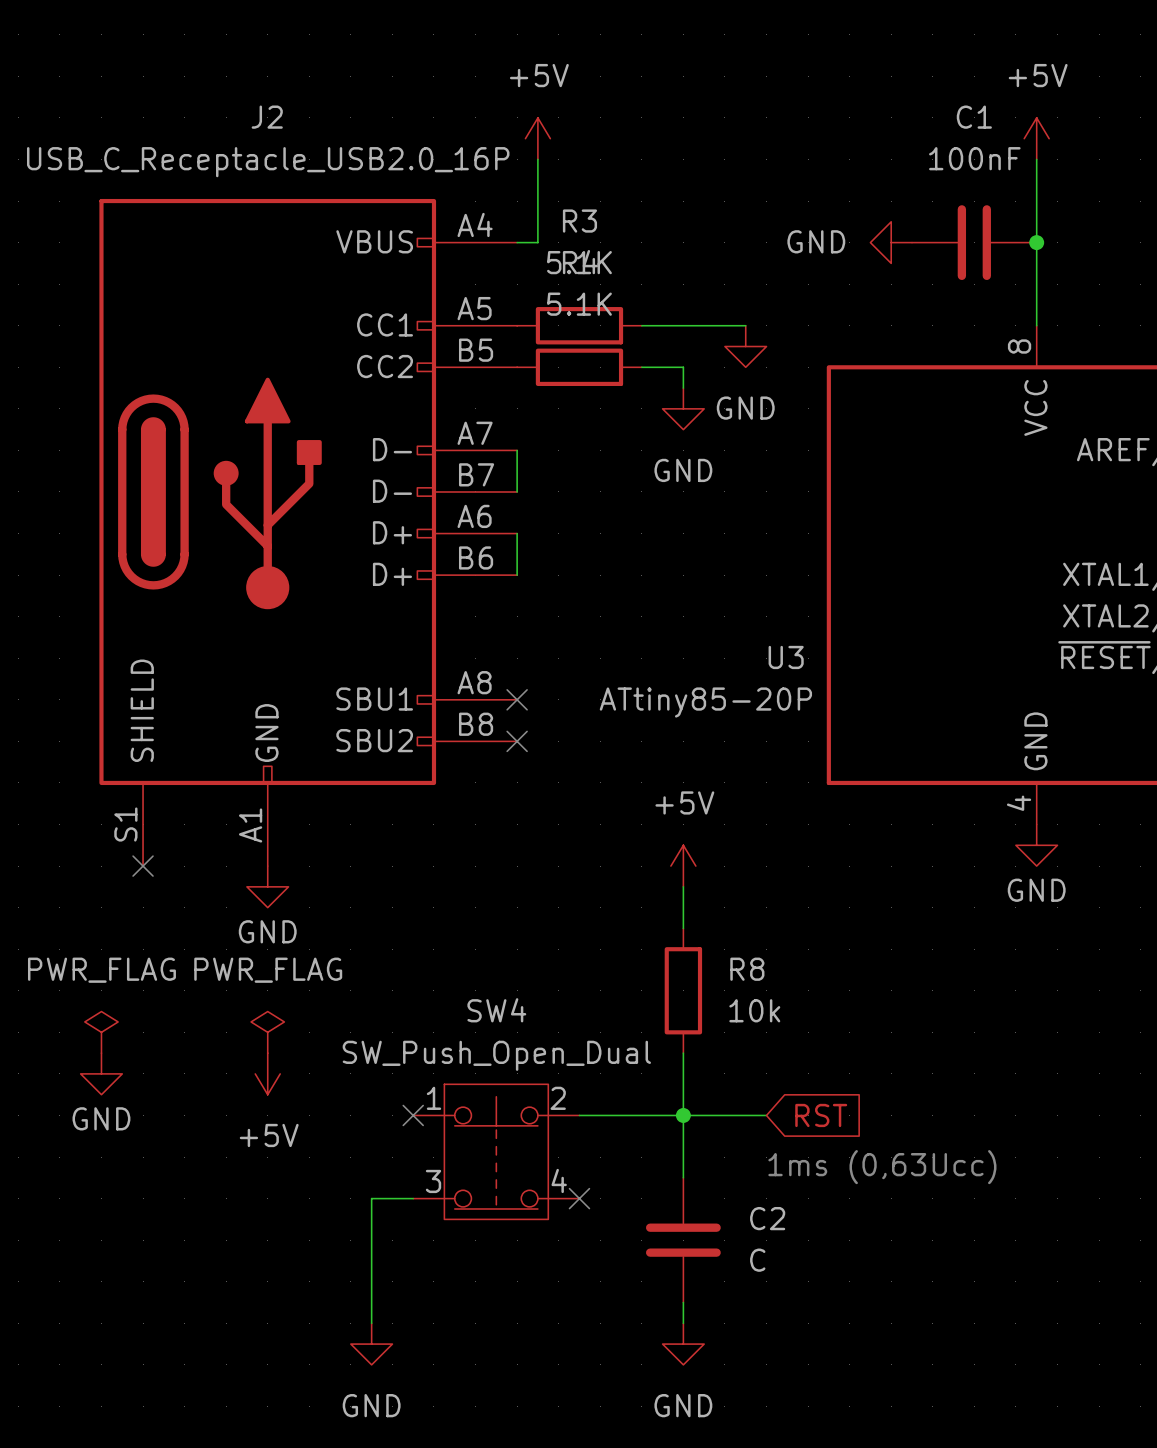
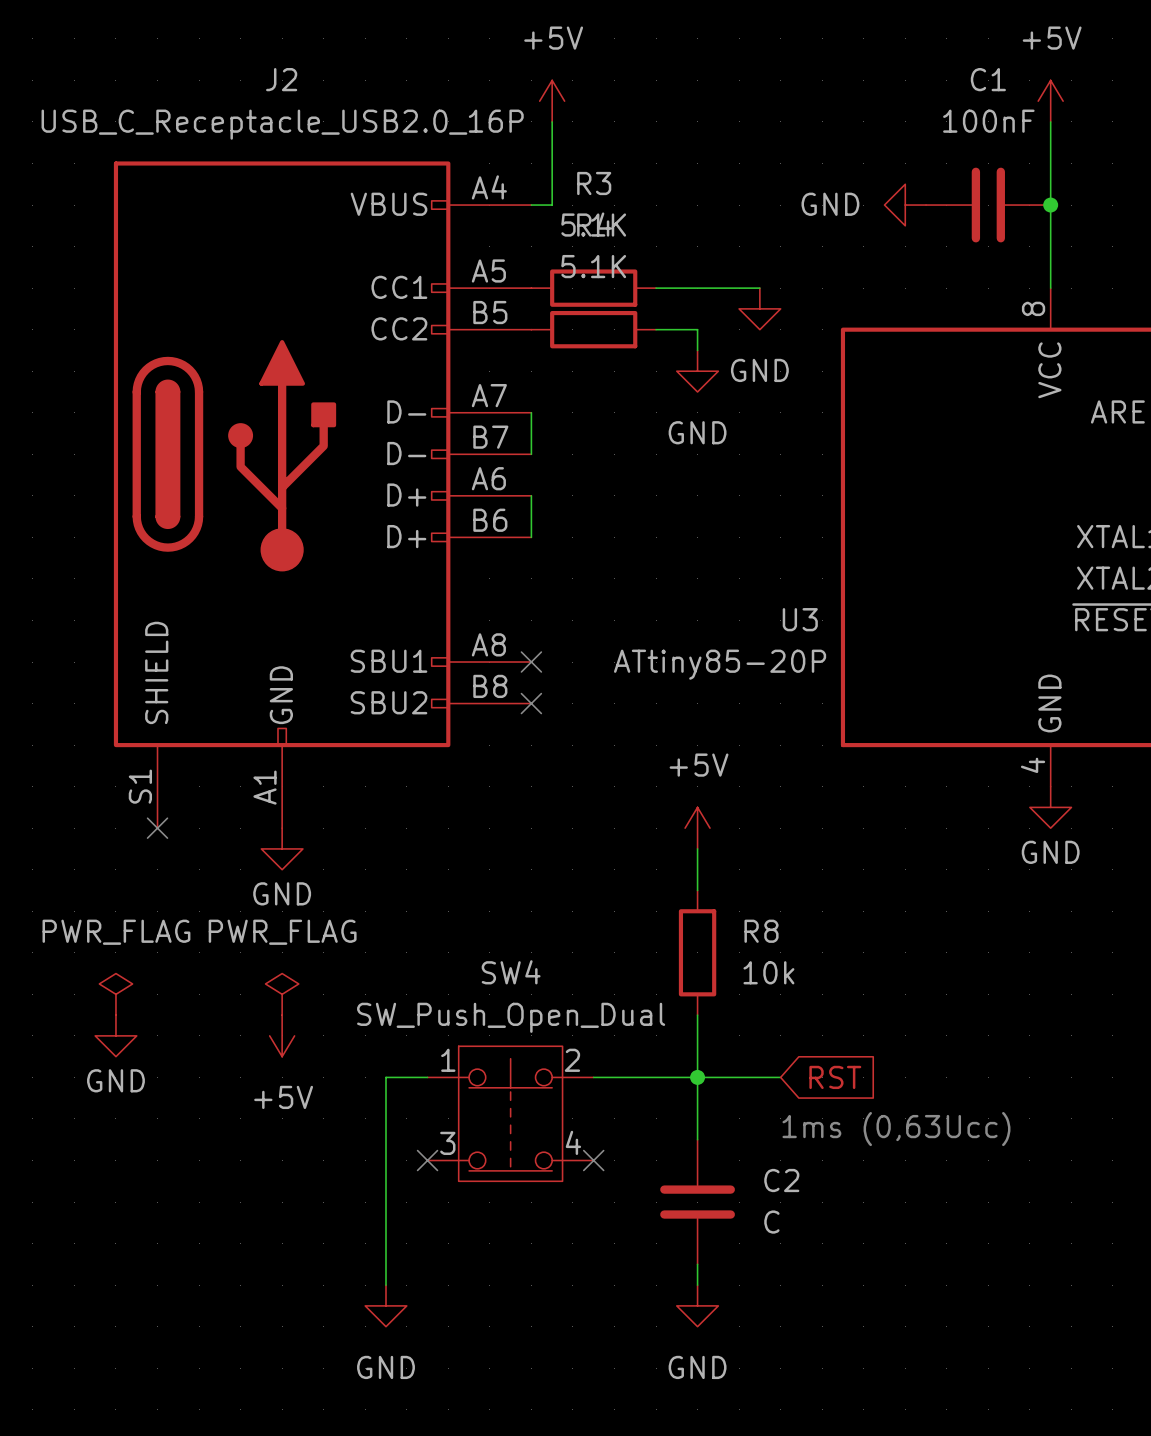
no-connect mark position: (413, 1115) -> (427, 1160)
wire: (371, 1198) (413, 1198) -> (385, 1160) (385, 1077) (427, 1077)

